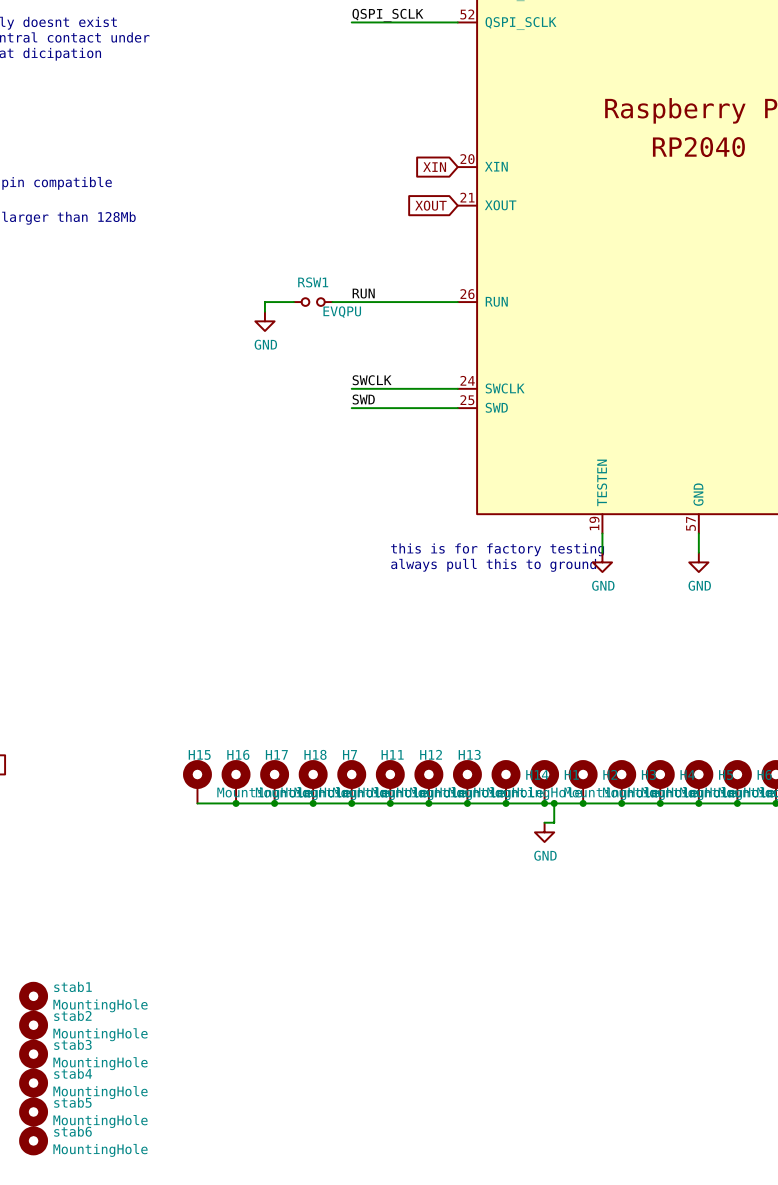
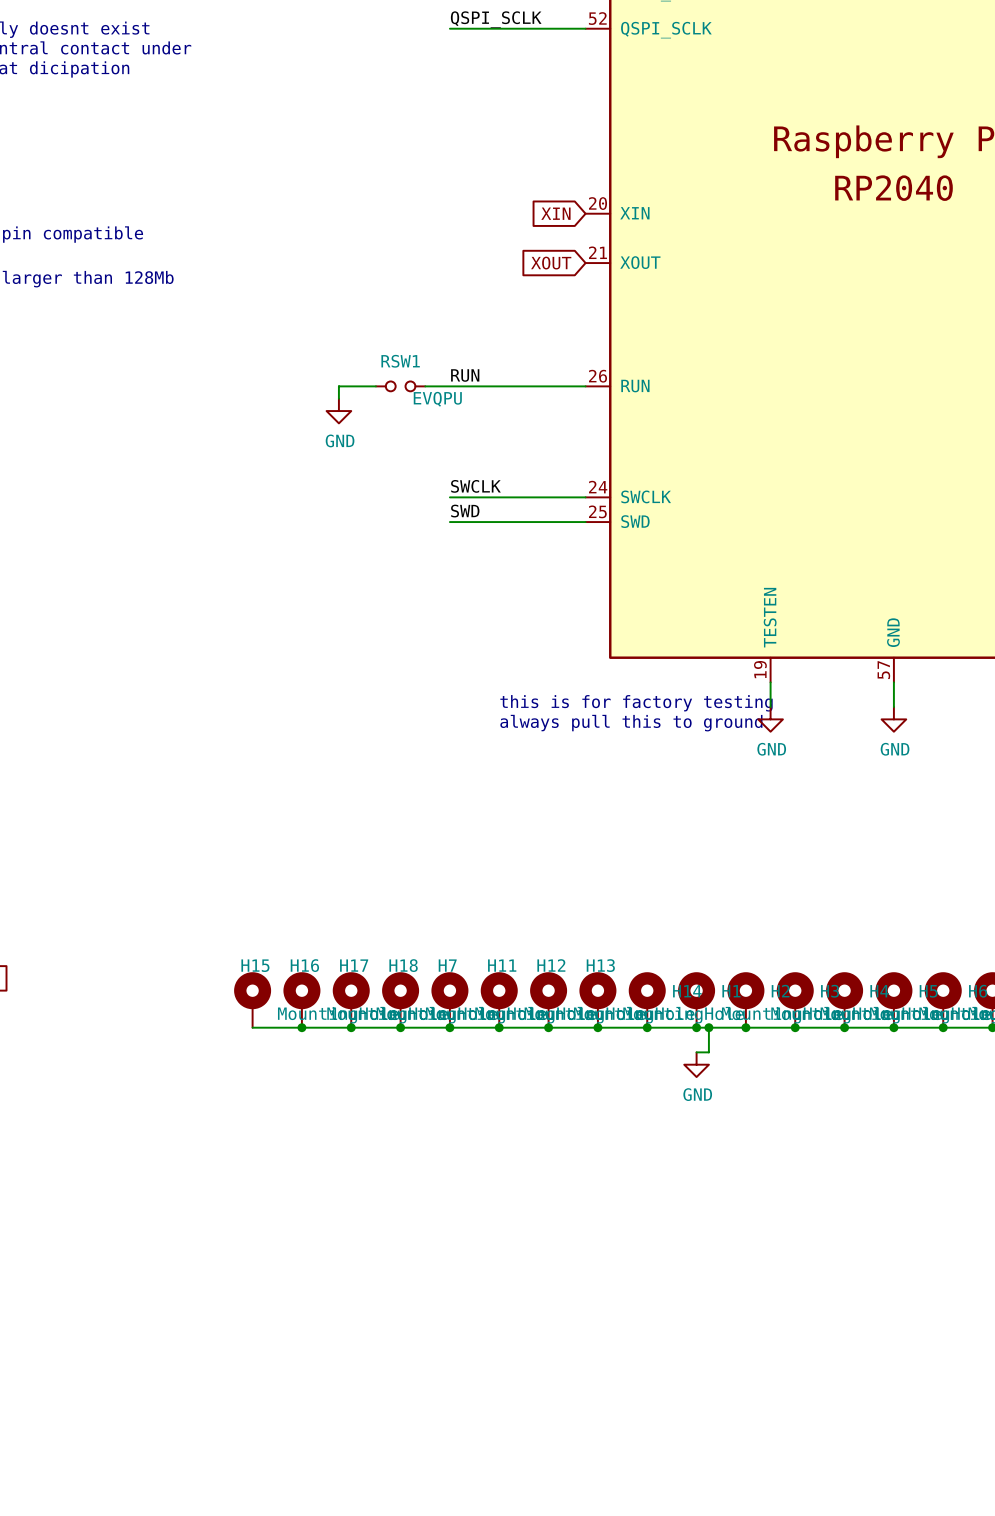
stab1: MountingHole (33, 996) -> none
stab2: MountingHole (33, 1025) -> none
stab3: MountingHole (33, 1054) -> none
stab4: MountingHole (33, 1083) -> none
stab5: MountingHole (33, 1111) -> none
stab6: MountingHole (33, 1140) -> none

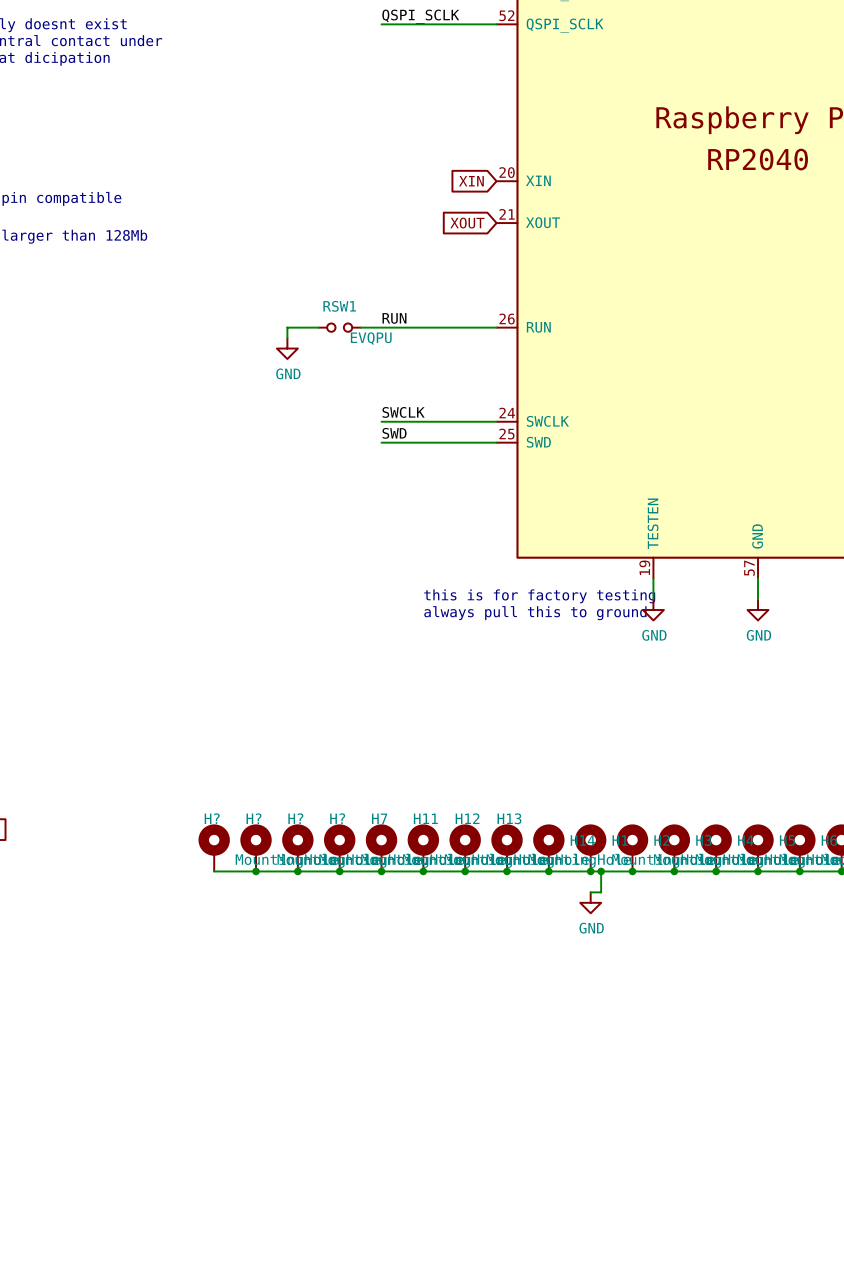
H15 name: H15 (255, 965) -> H? (212, 818)
H16 name: H16 (304, 965) -> H? (254, 818)
H17 name: H17 (354, 965) -> H? (295, 818)
H18 name: H18 (403, 965) -> H? (337, 818)

